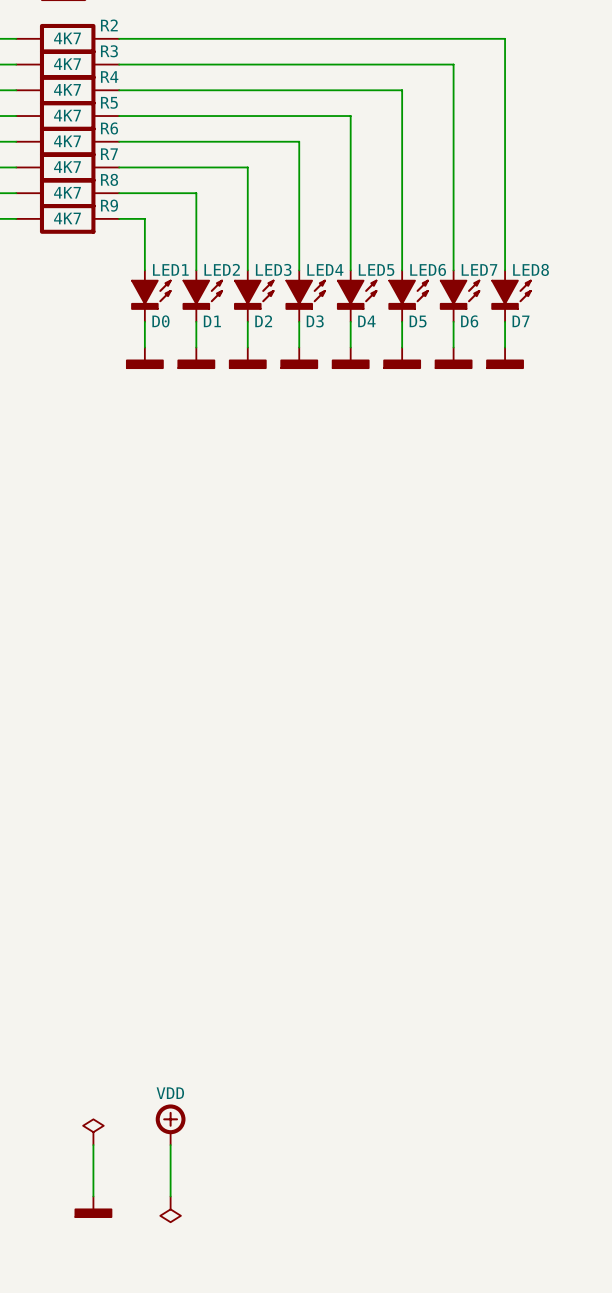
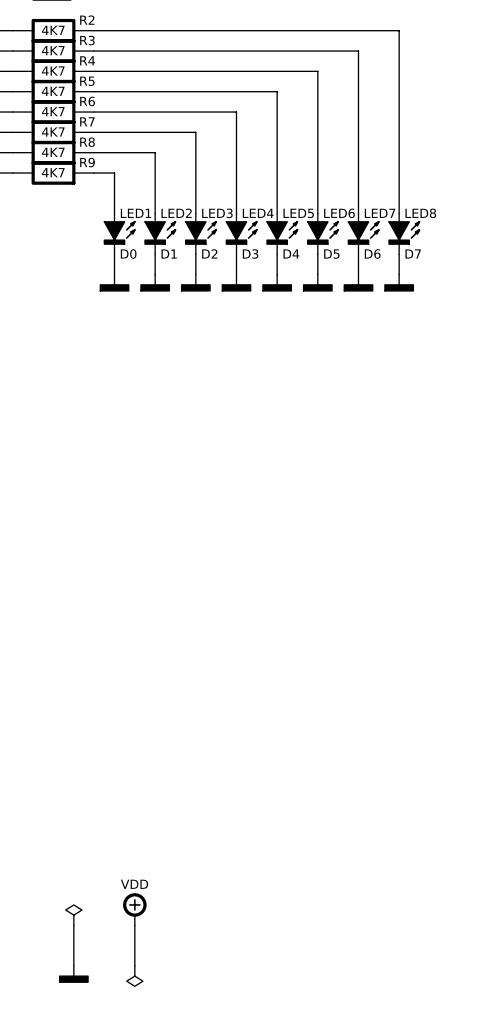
power symbol position: (170, 1124) -> (134, 909)
power symbol position: (93, 1132) -> (73, 915)
power symbol position: (93, 1206) -> (73, 974)
power symbol position: (170, 1209) -> (134, 976)

